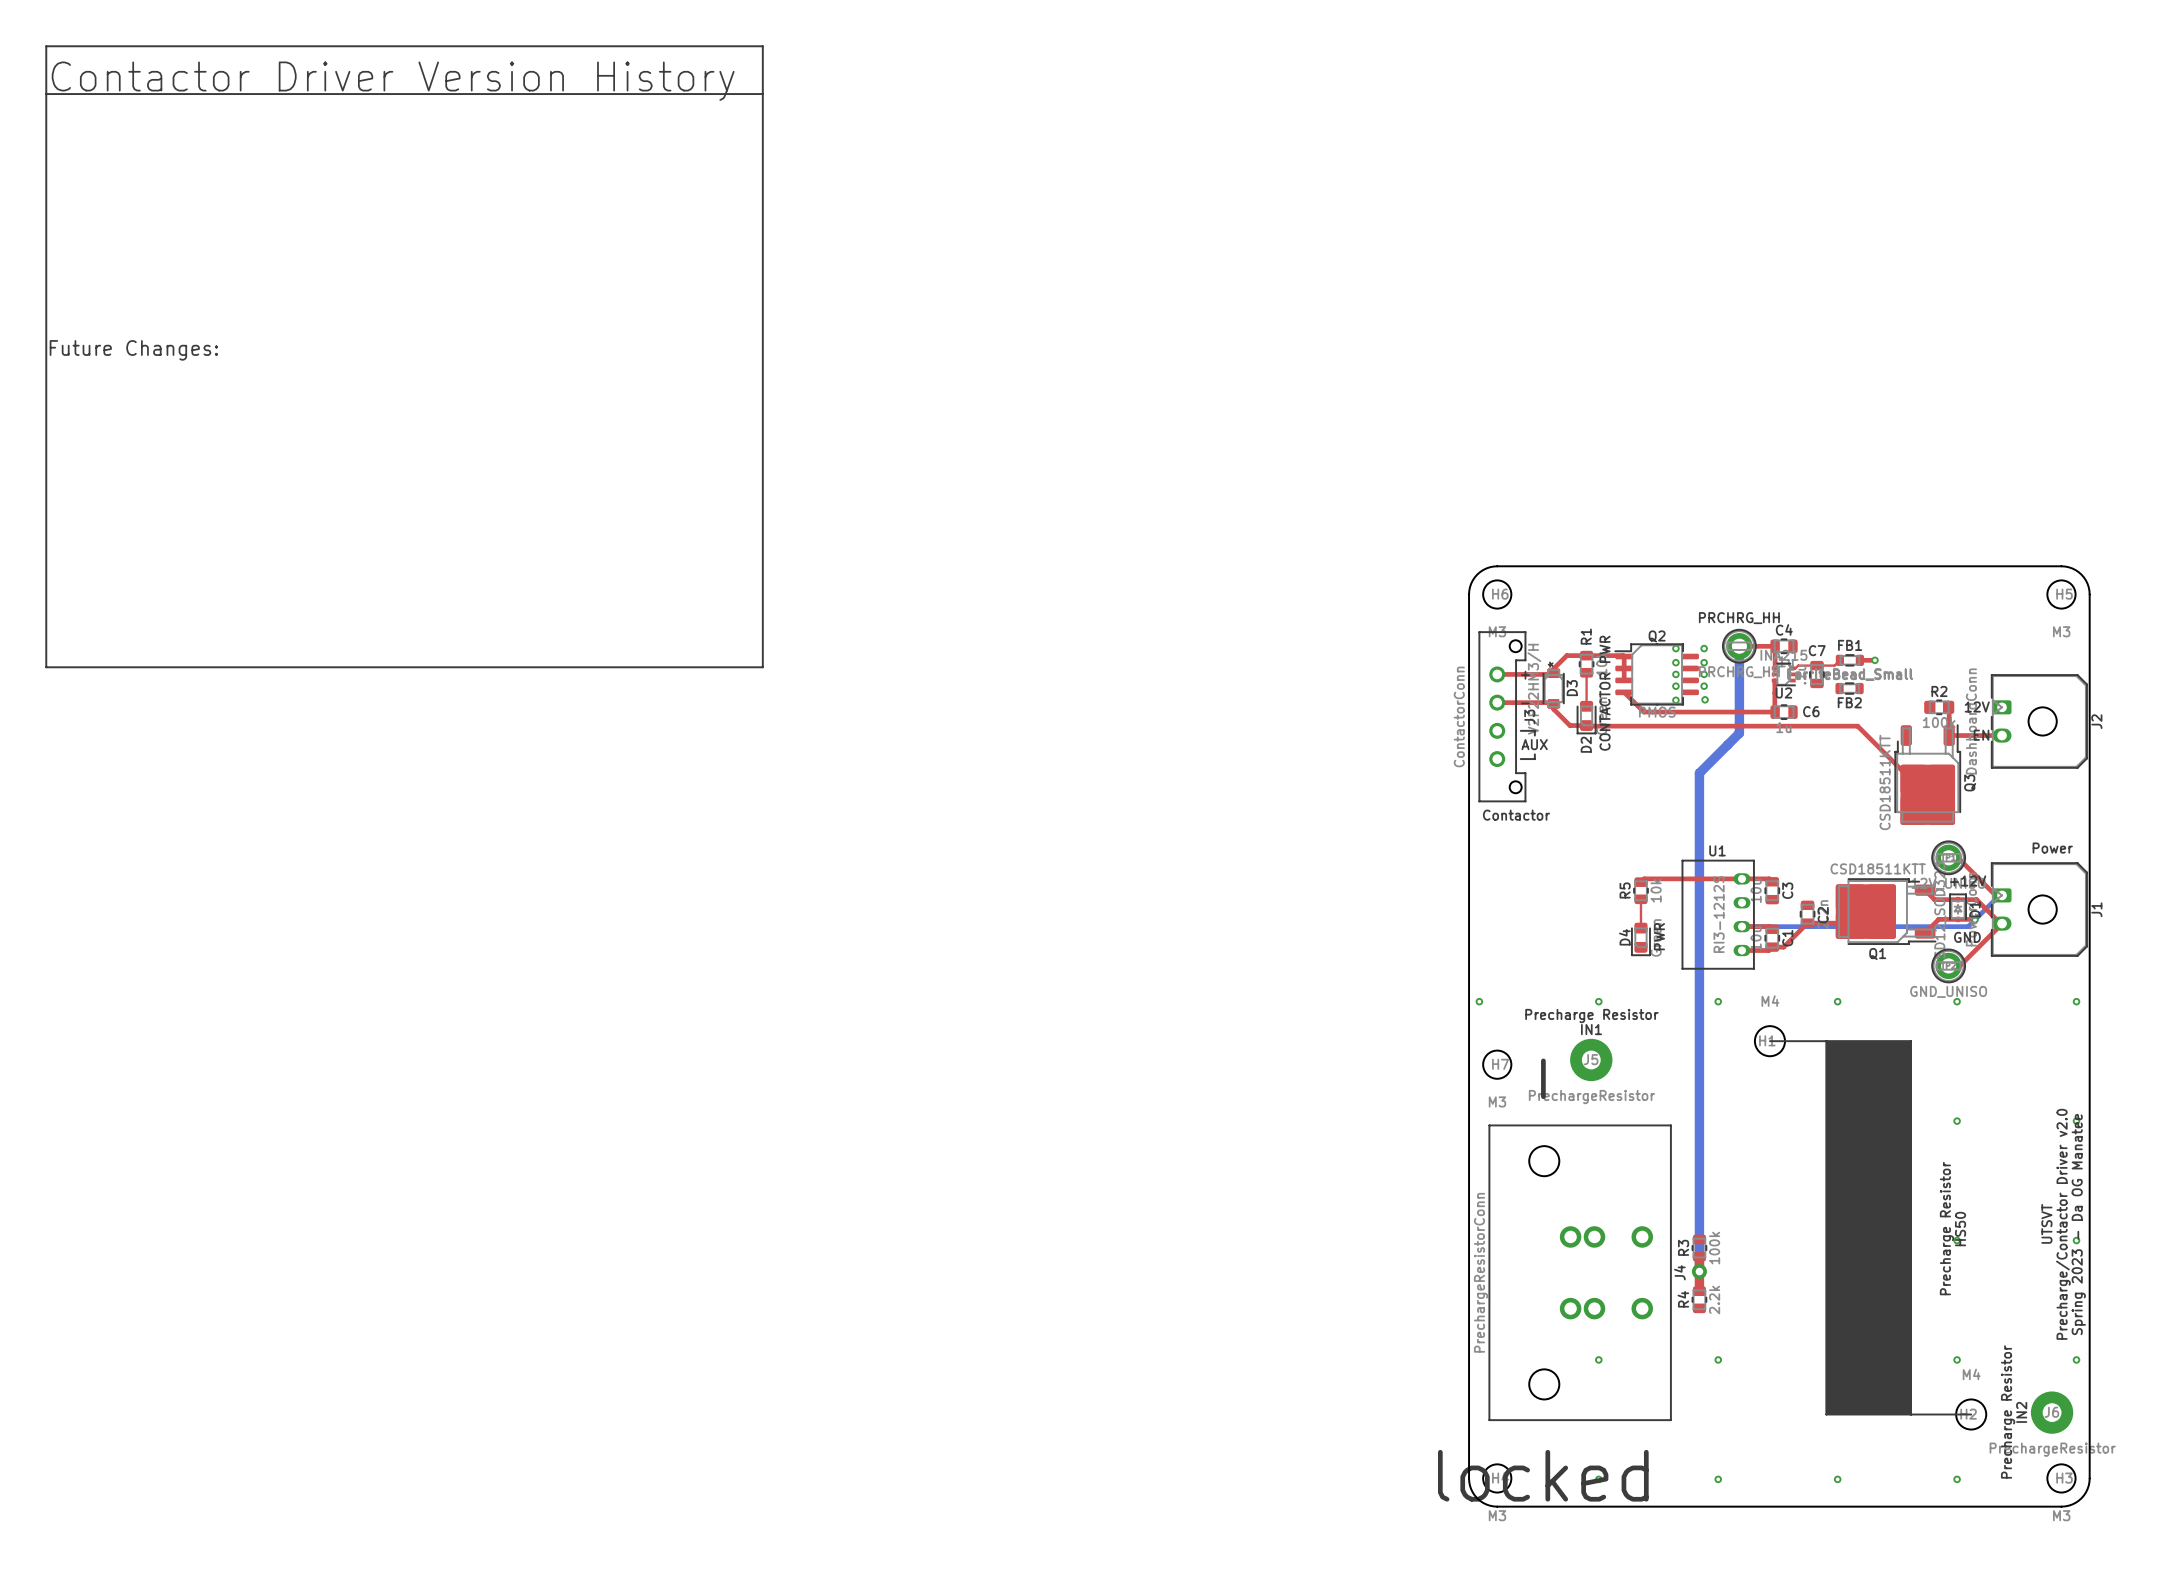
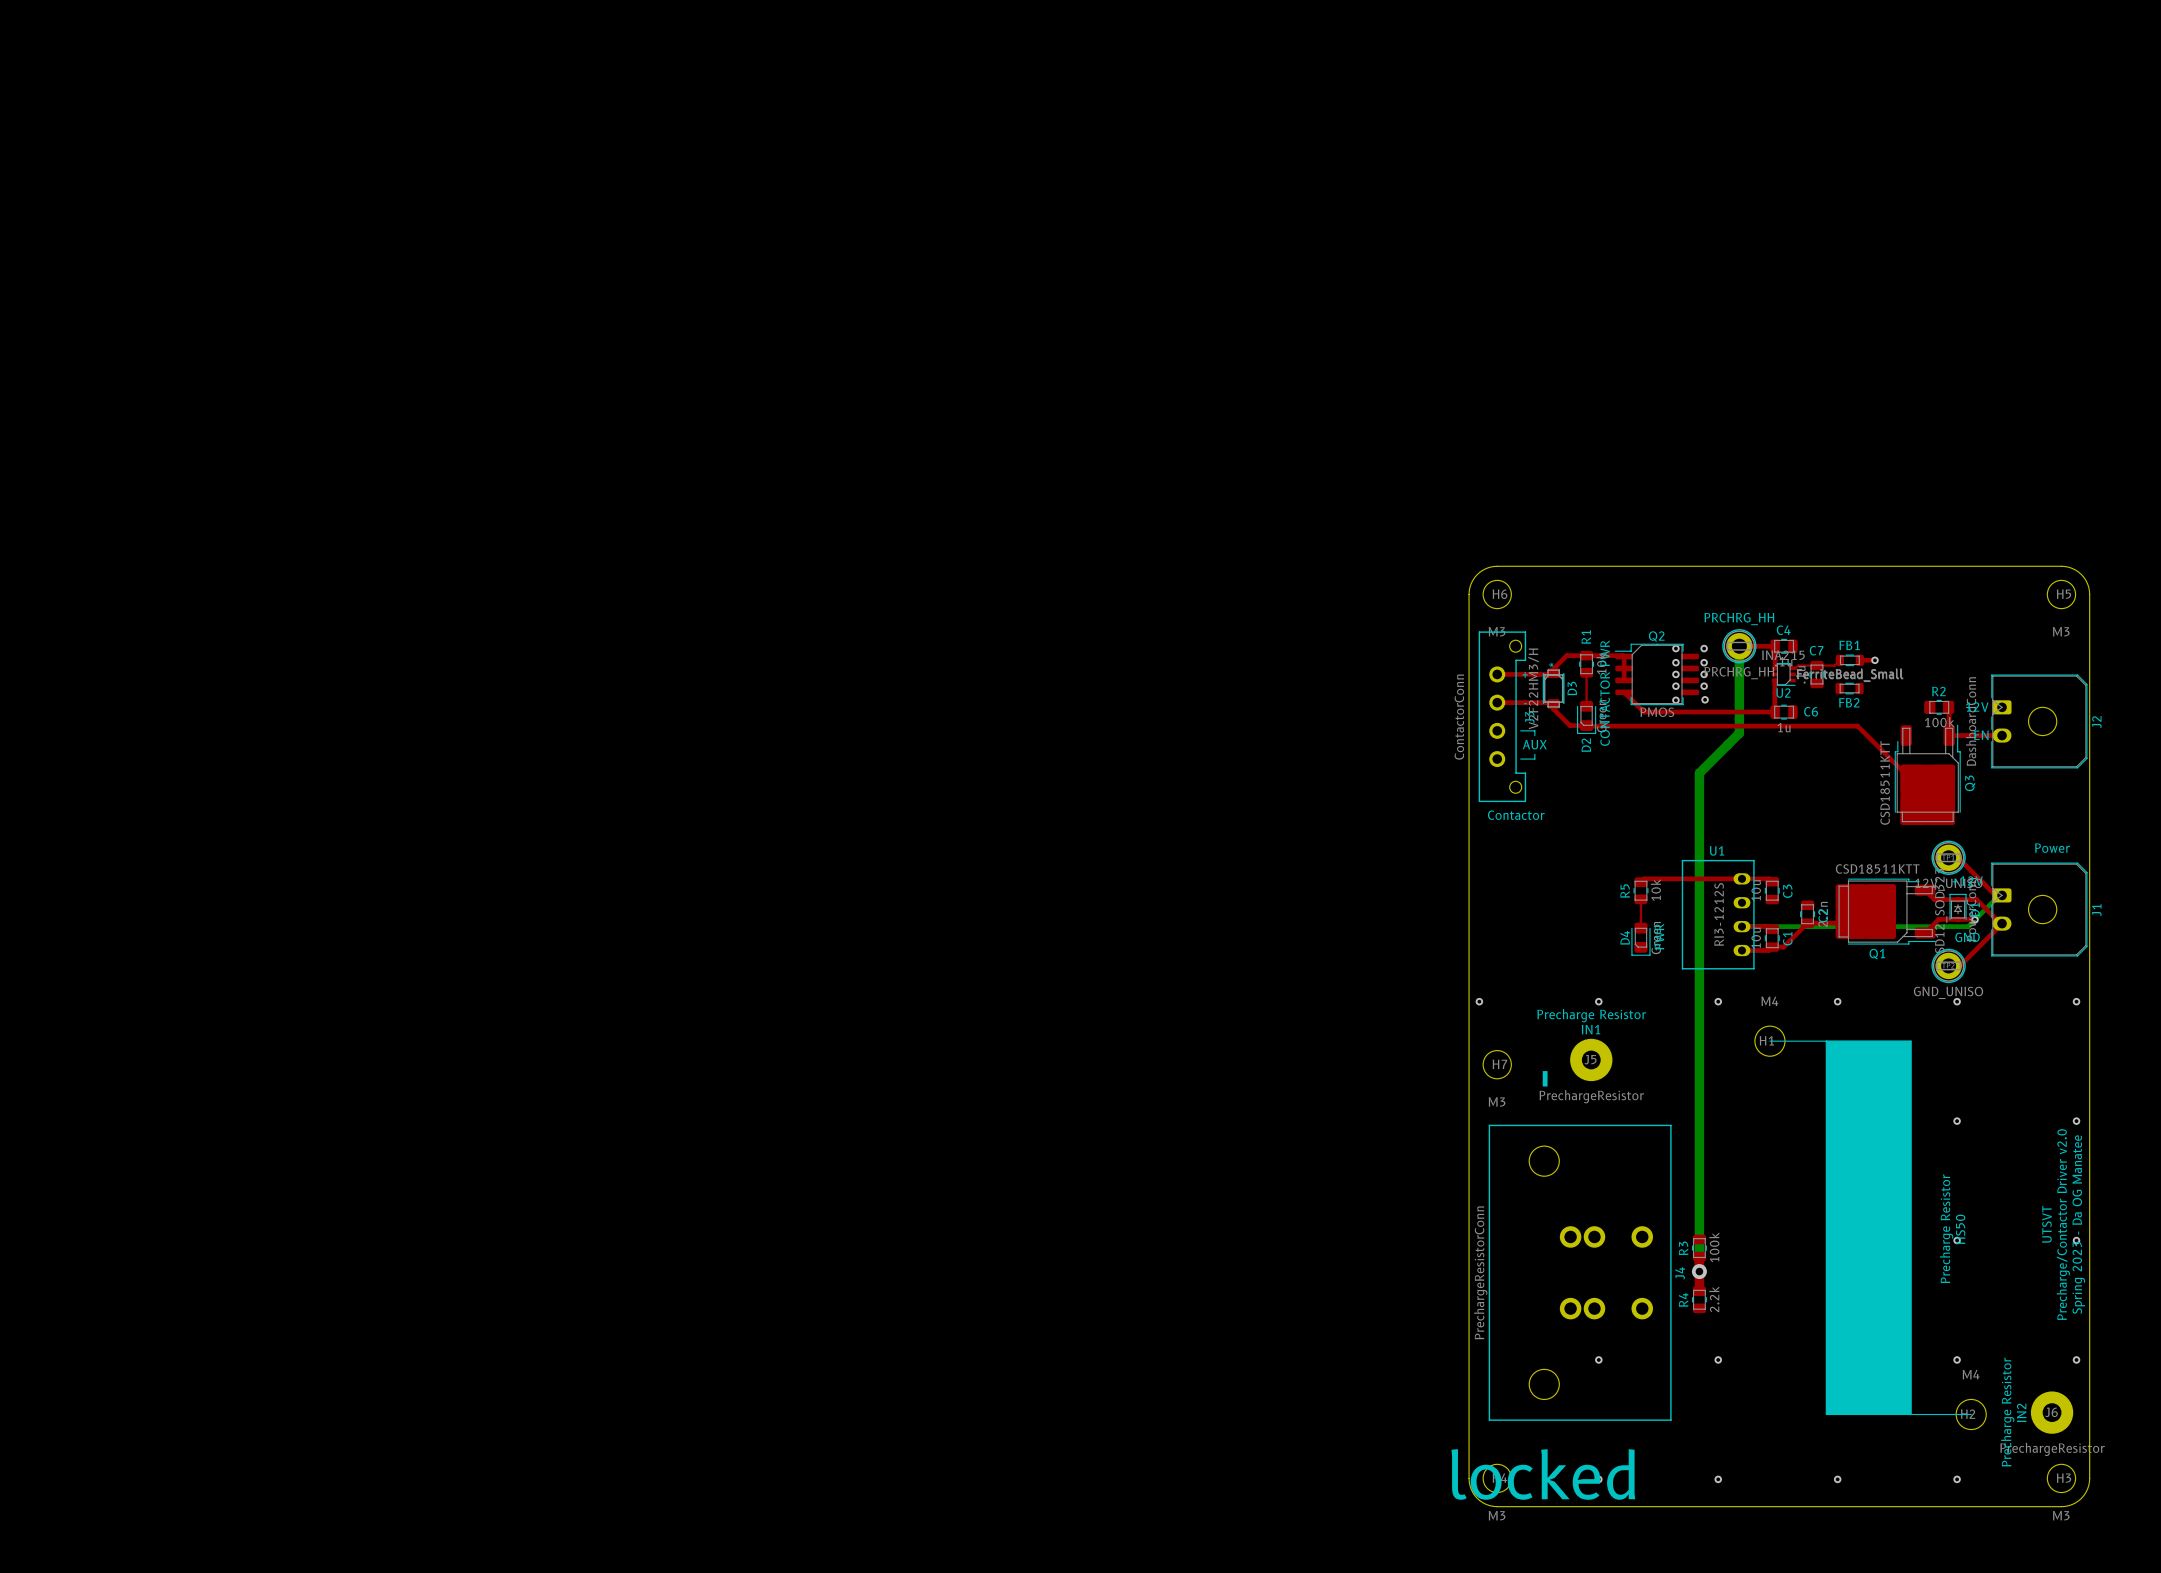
line: (46, 46) (762, 46) (762, 667) (46, 667) (46, 46) -> none
text: Contactor Driver Version History (393, 81) -> none
line: (46, 94) (762, 94) -> none
text: Future Changes: (133, 350) -> none

